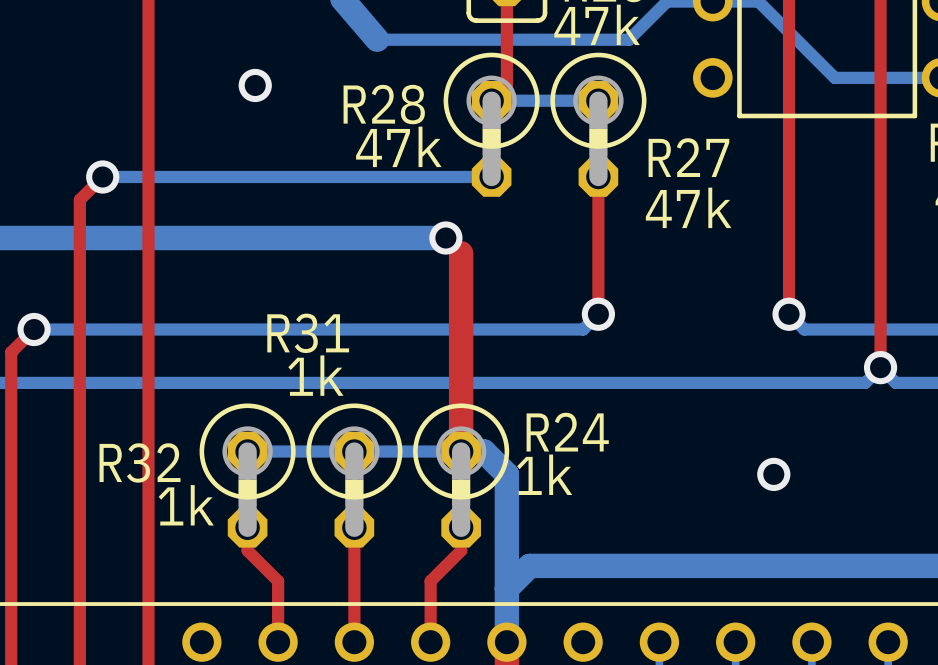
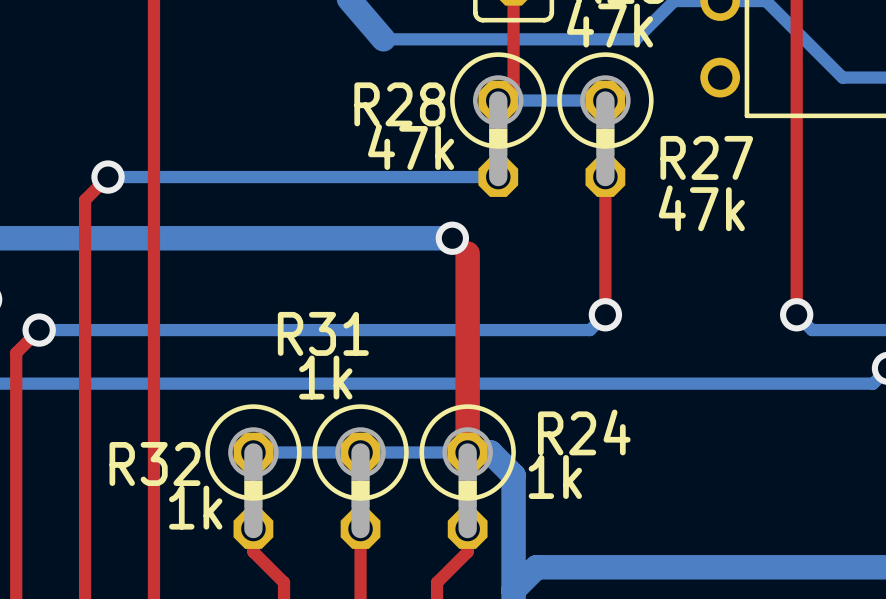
via: (255, 85) -> none
via: (773, 474) -> none

